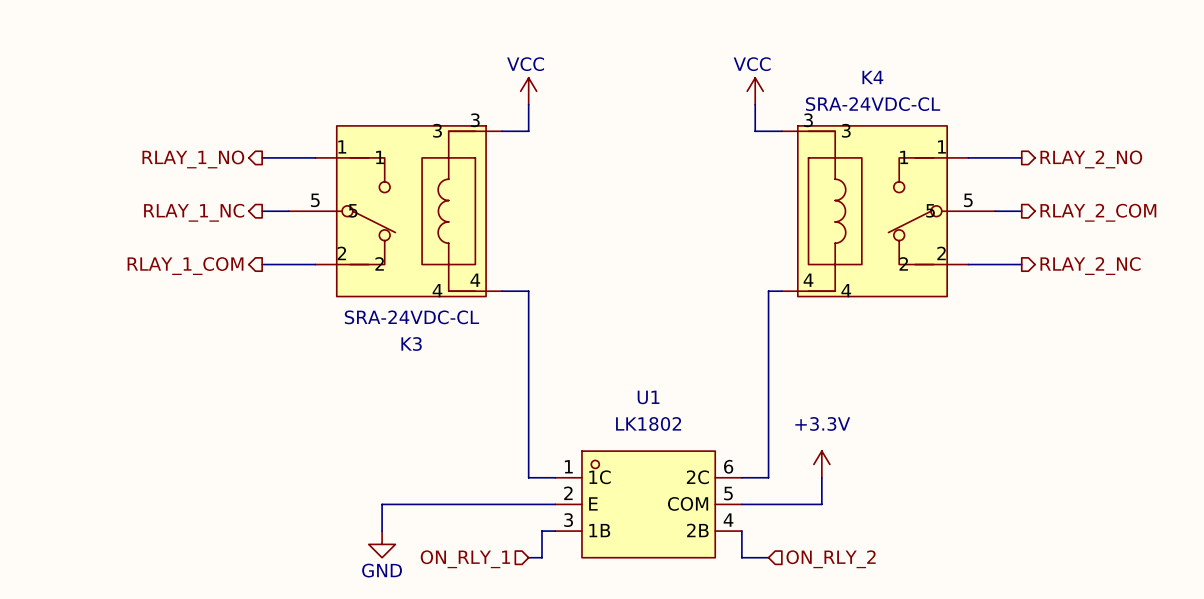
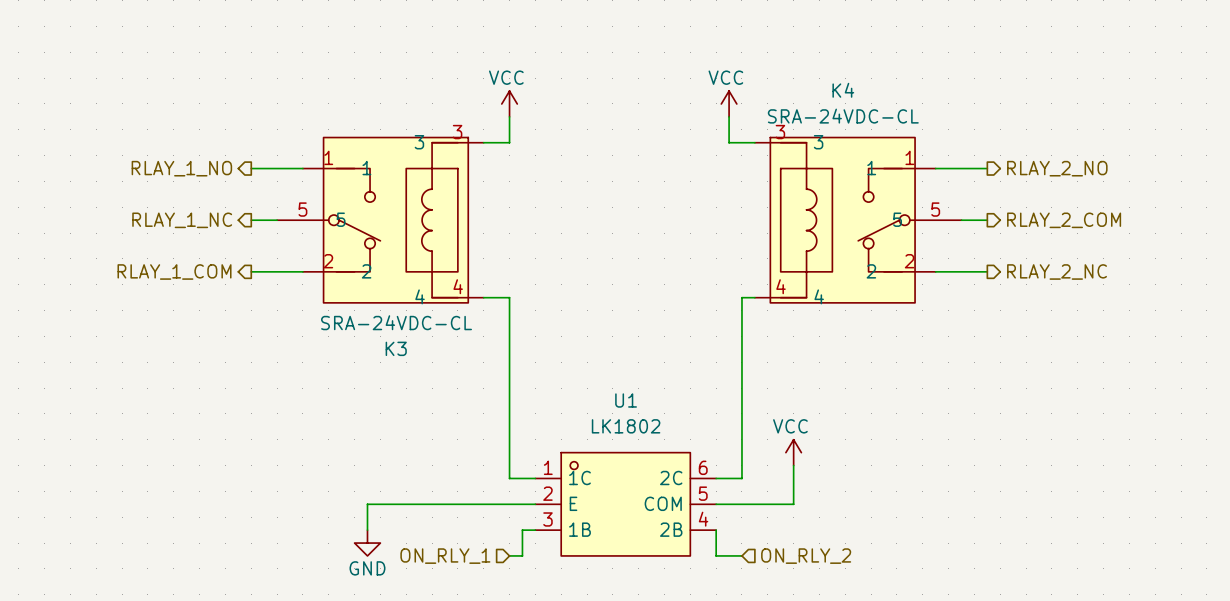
power symbol: none -> VCC (793, 452)
power symbol: +3.3V (821, 464) -> none

